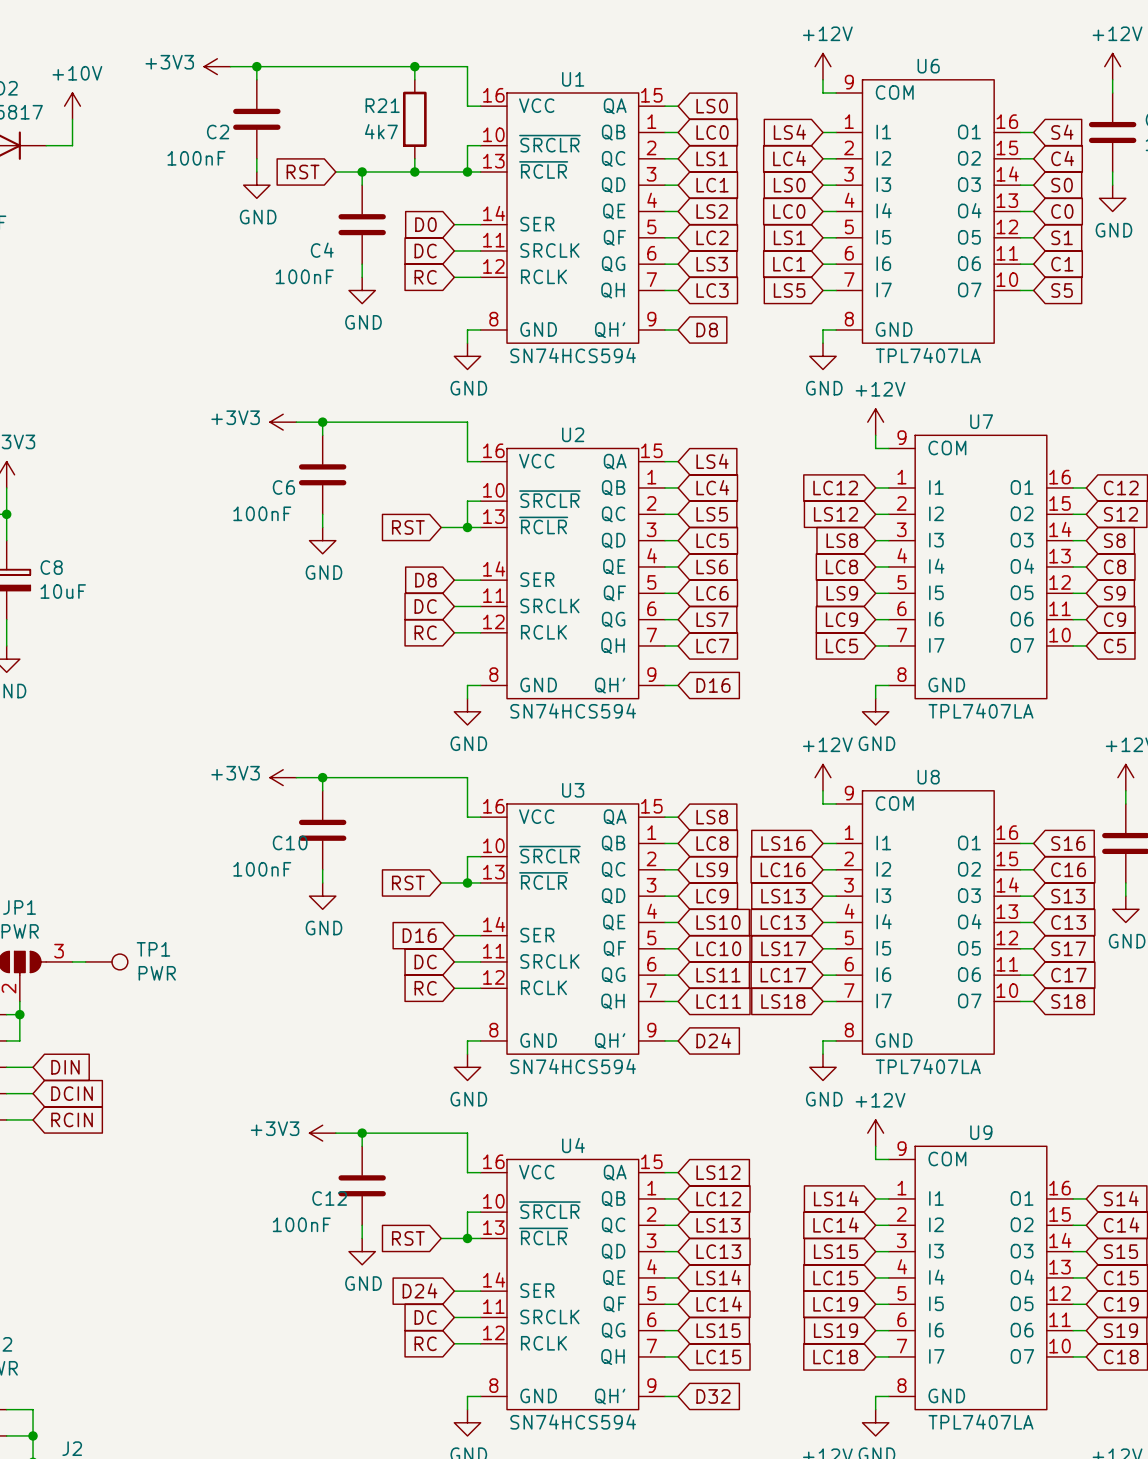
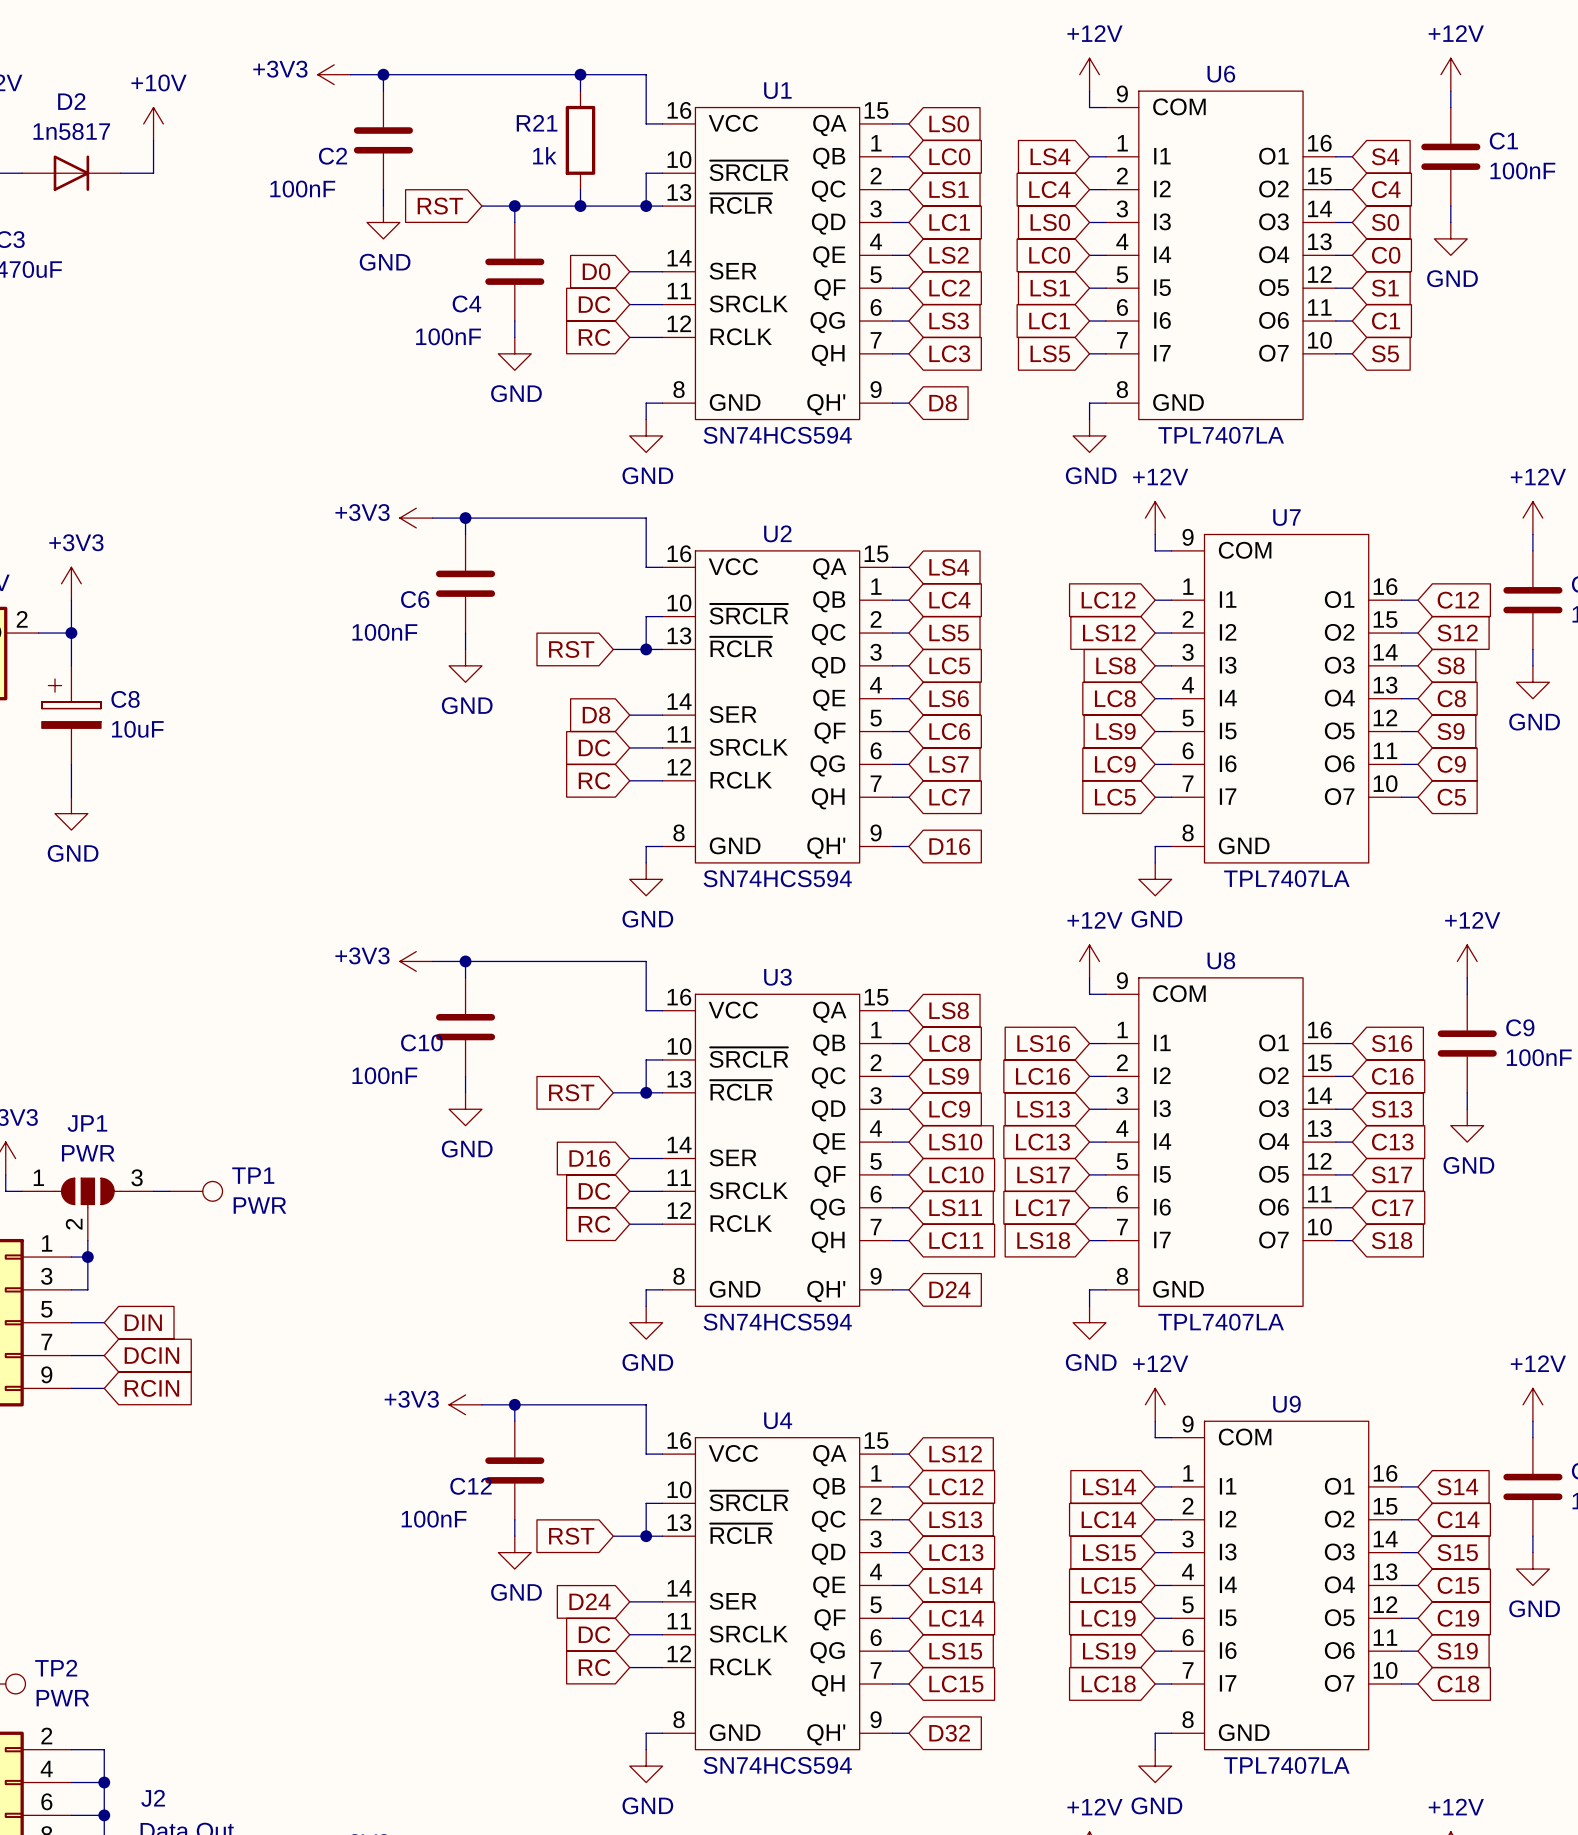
R21 value: 4k7 (381, 131) -> 1k (544, 155)

